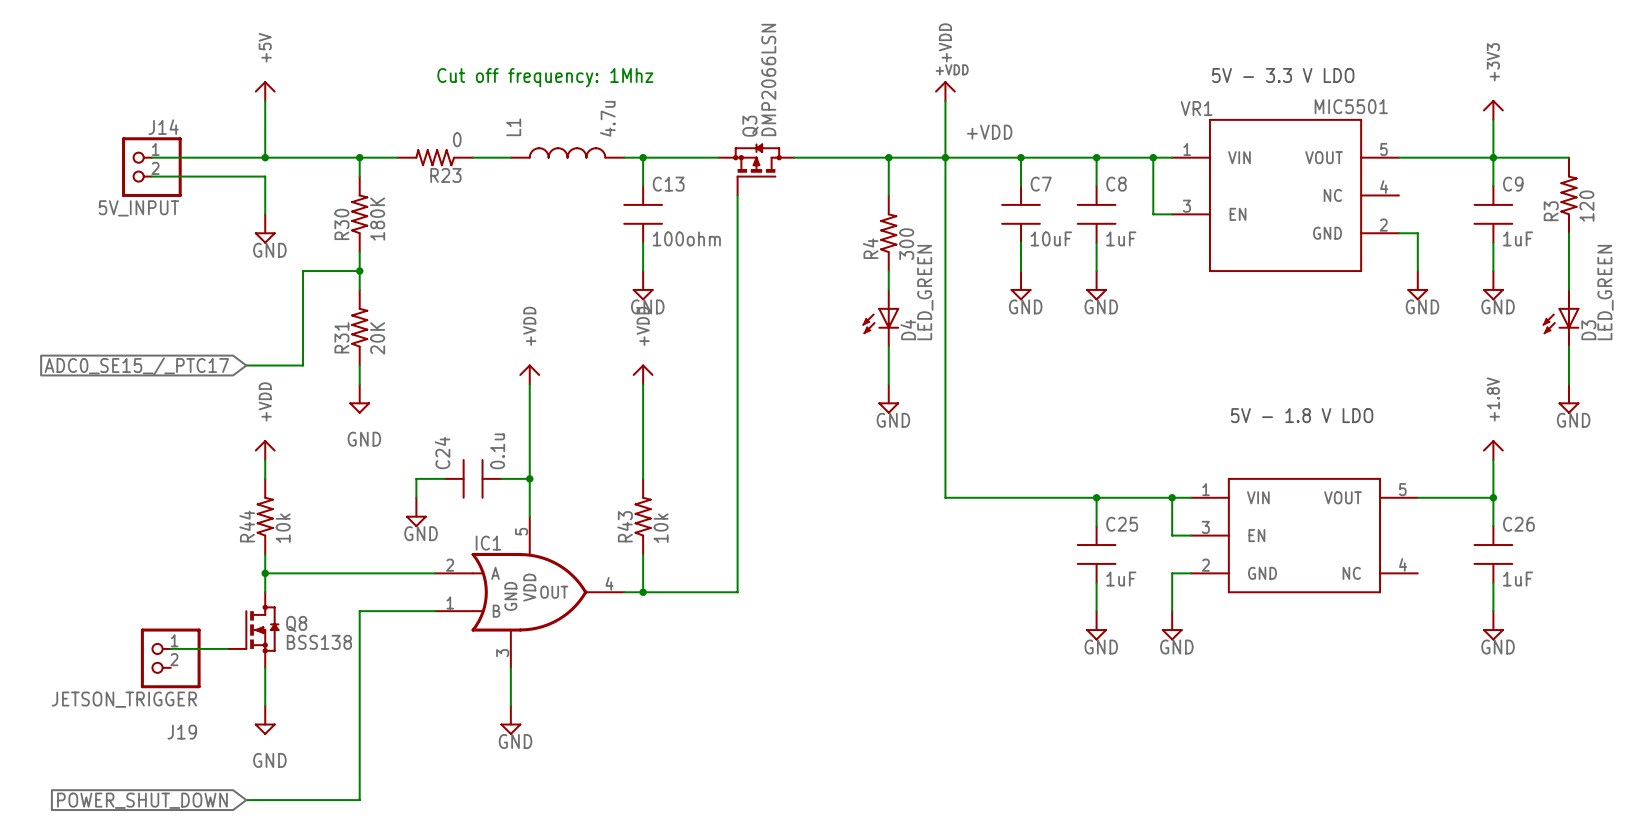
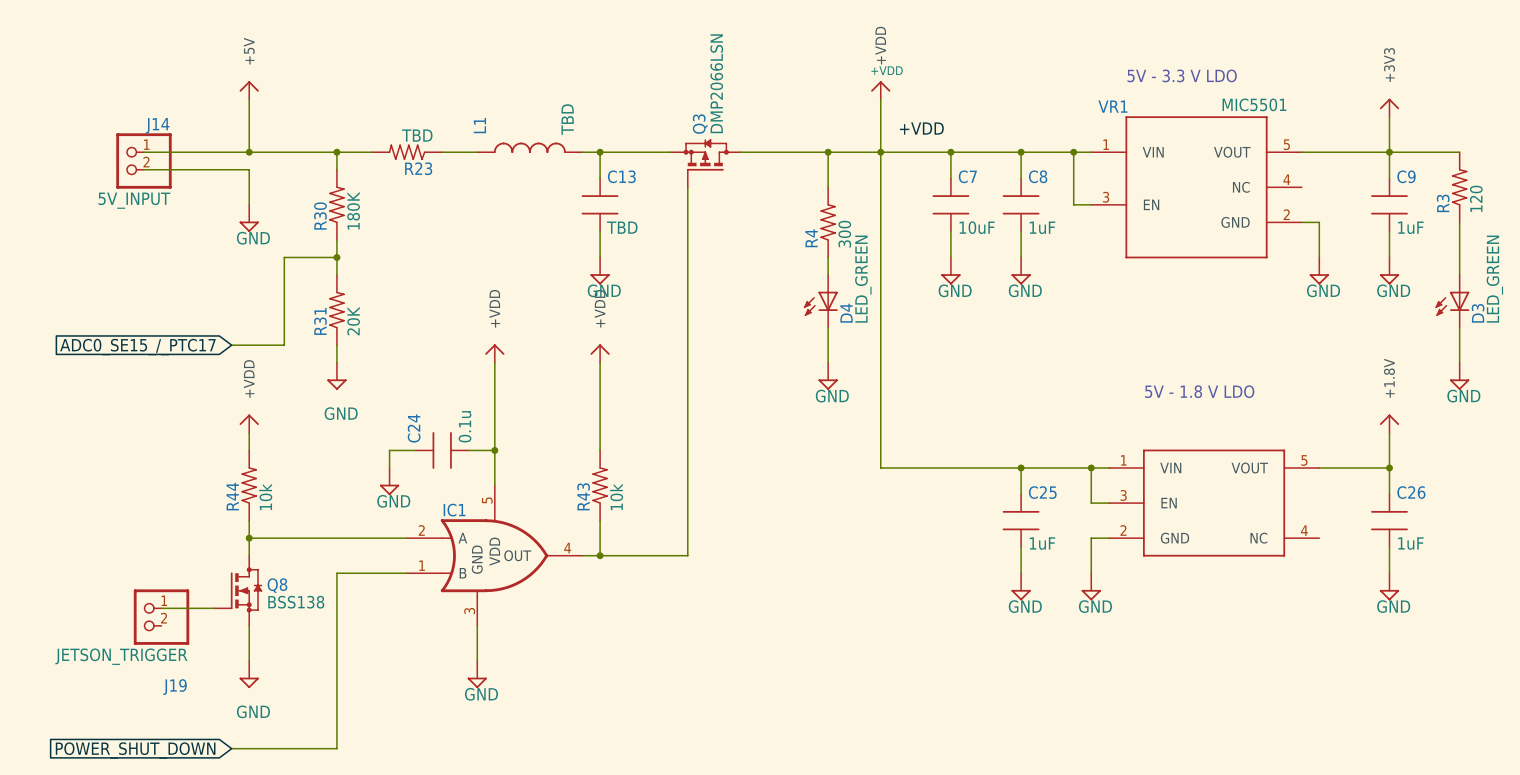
text: Cut off frequency: 1Mhz (545, 77) -> none
L1 value: 4.7u (607, 118) -> TBD (567, 119)
R23 value: 0 (457, 139) -> TBD (417, 135)
C13 value: 100ohm (686, 238) -> TBD (622, 227)

